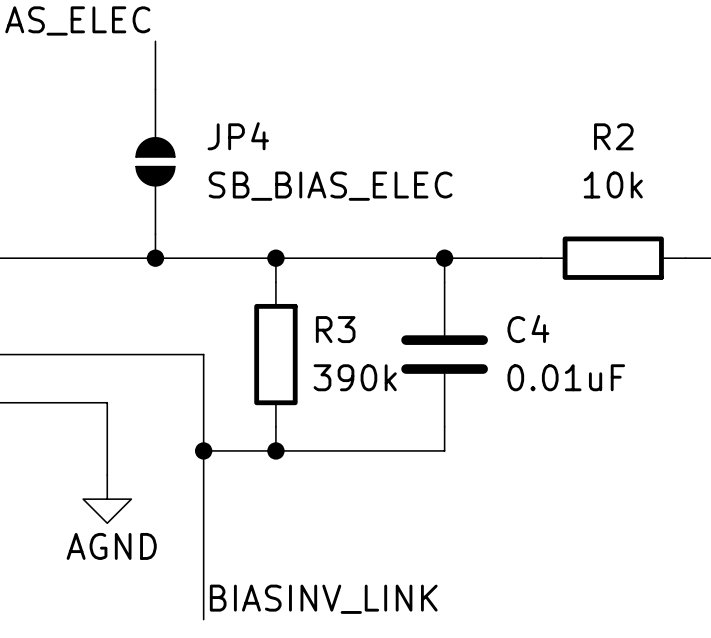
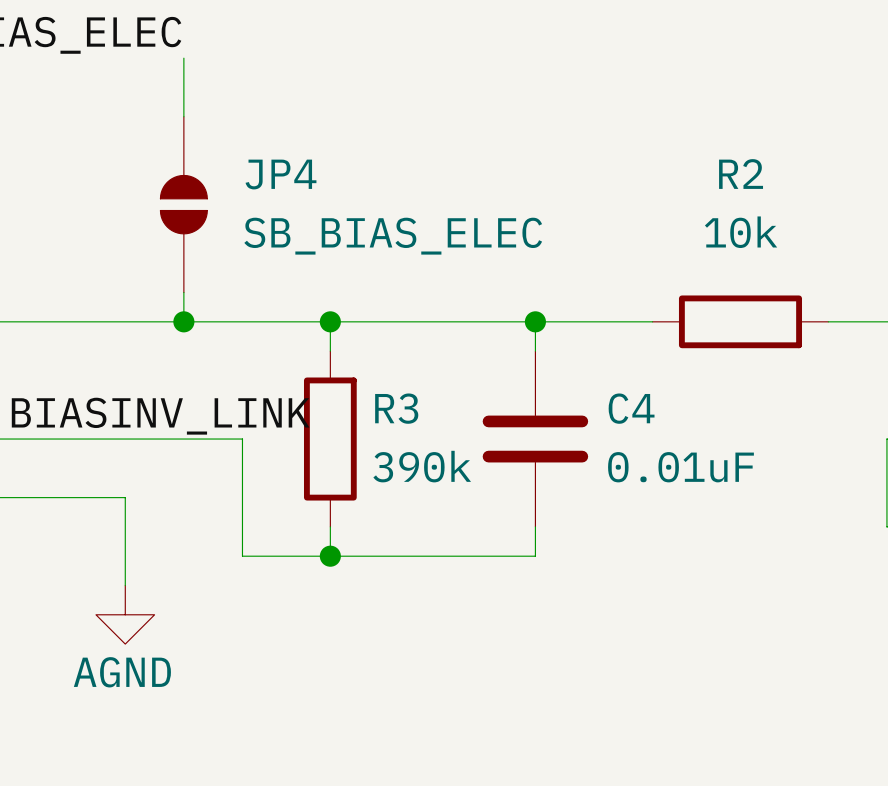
wire: (203, 450) (203, 619) -> none
junction: (203, 450) -> none
label position: BIASINV_LINK (323, 599) -> BIASINV_LINK (160, 416)

